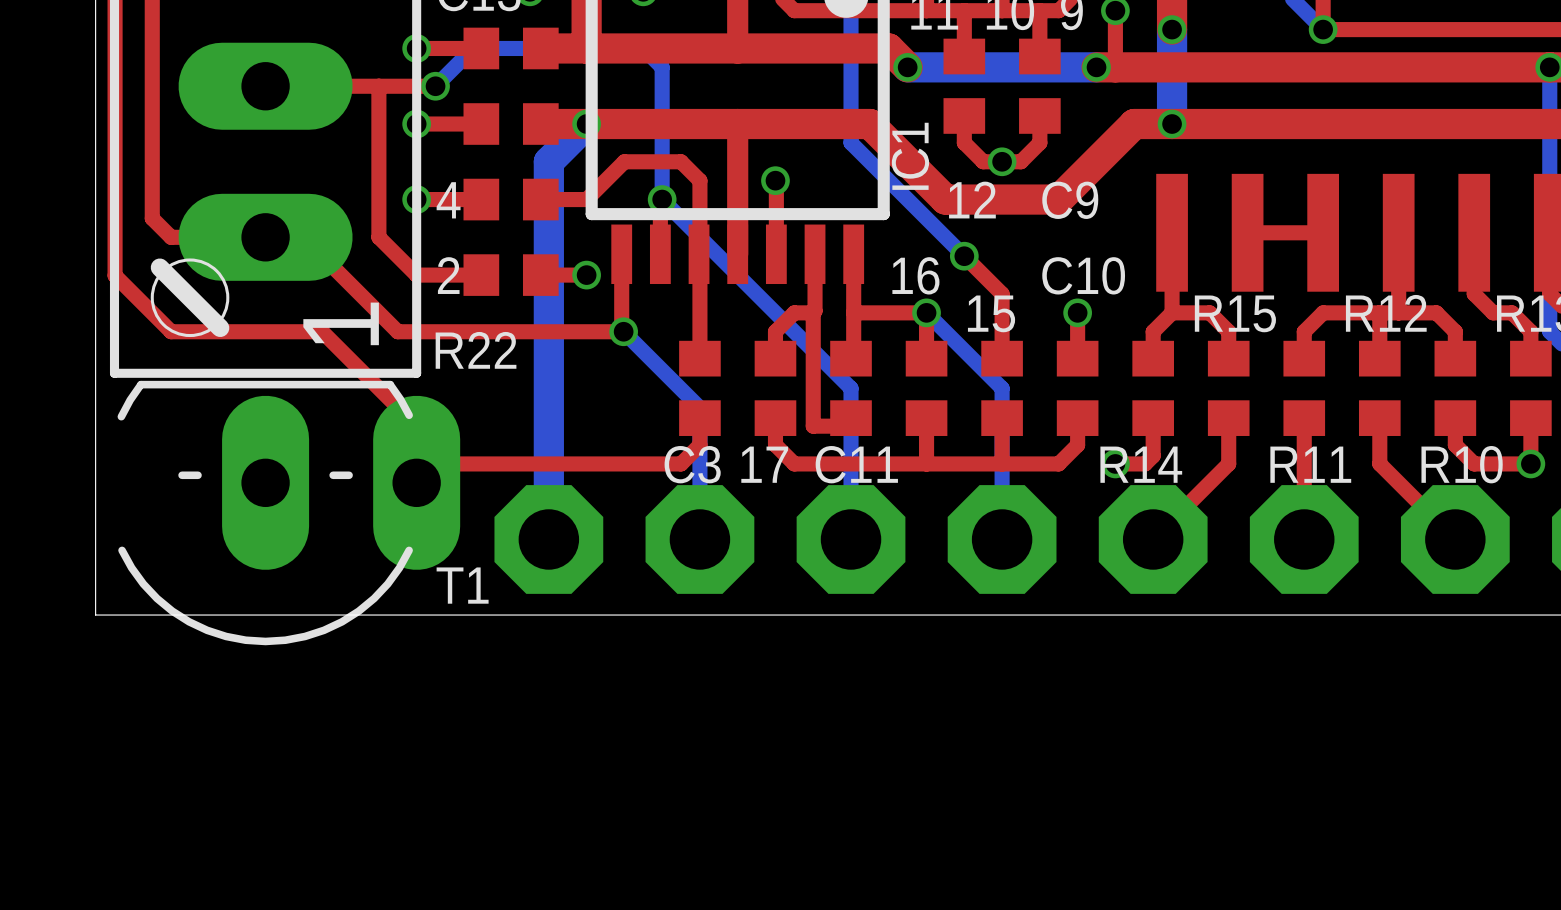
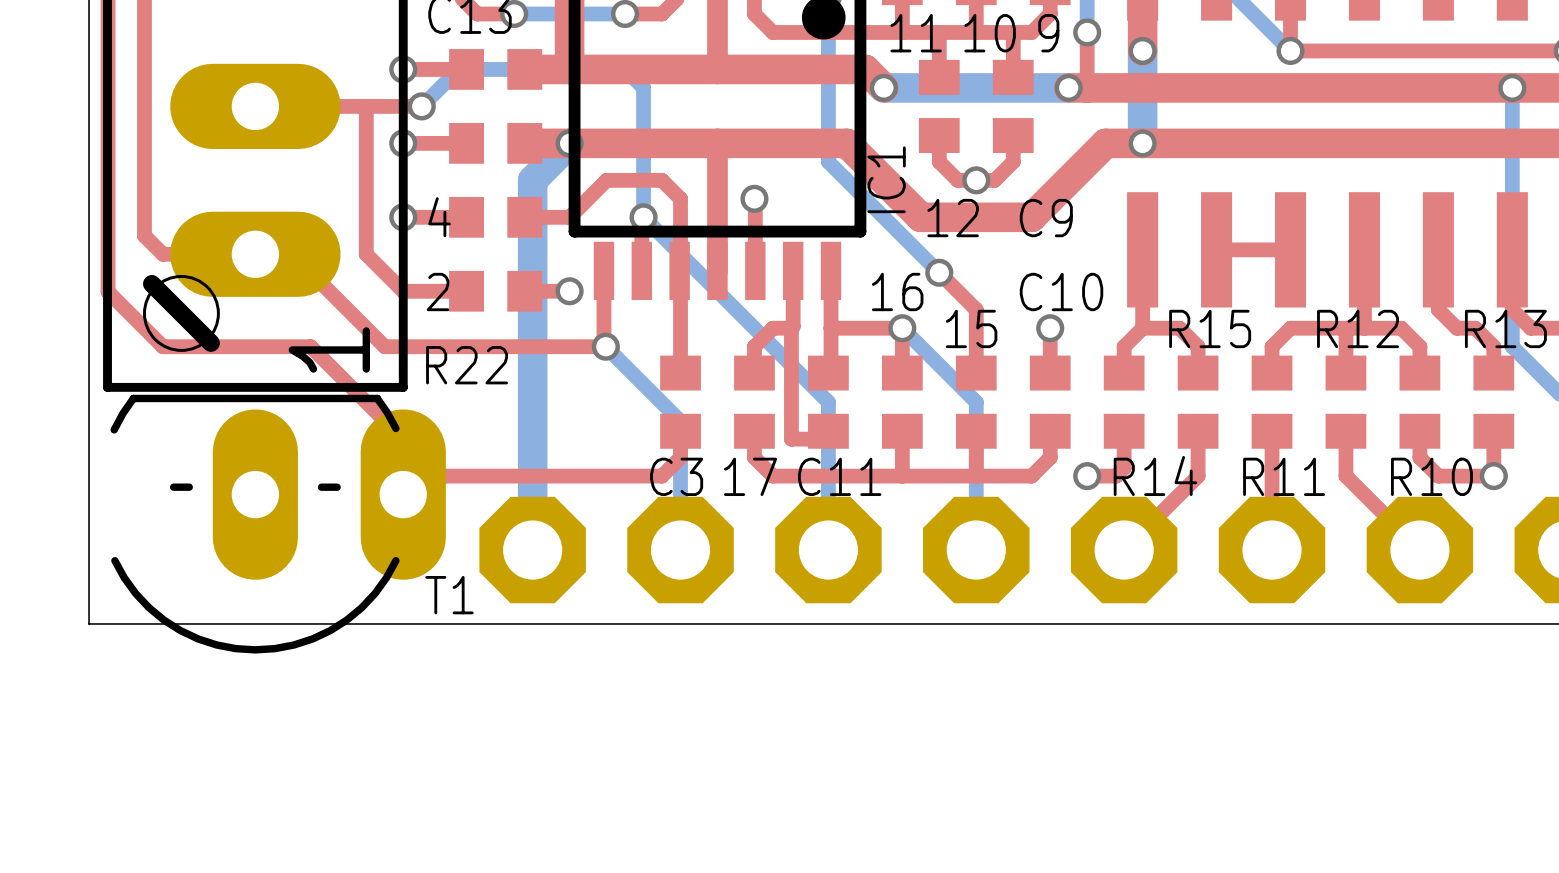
R14 name position: R14 (1141, 464) -> R14 (1155, 476)

